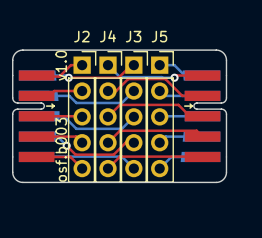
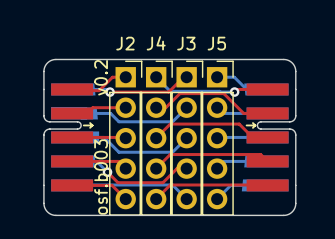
text: v1.0 (61, 65) -> v0.2 (101, 77)

